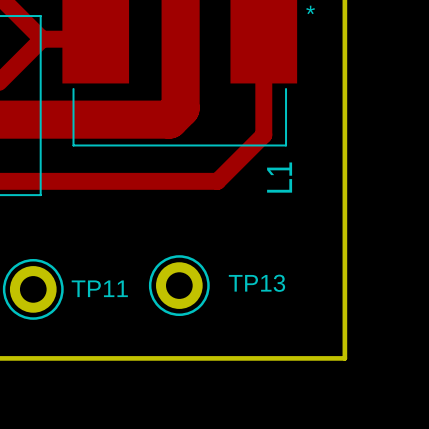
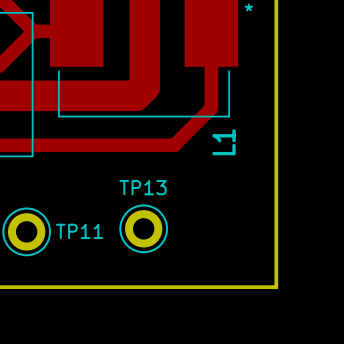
TP13 name position: TP13 (256, 283) -> TP13 (143, 187)

